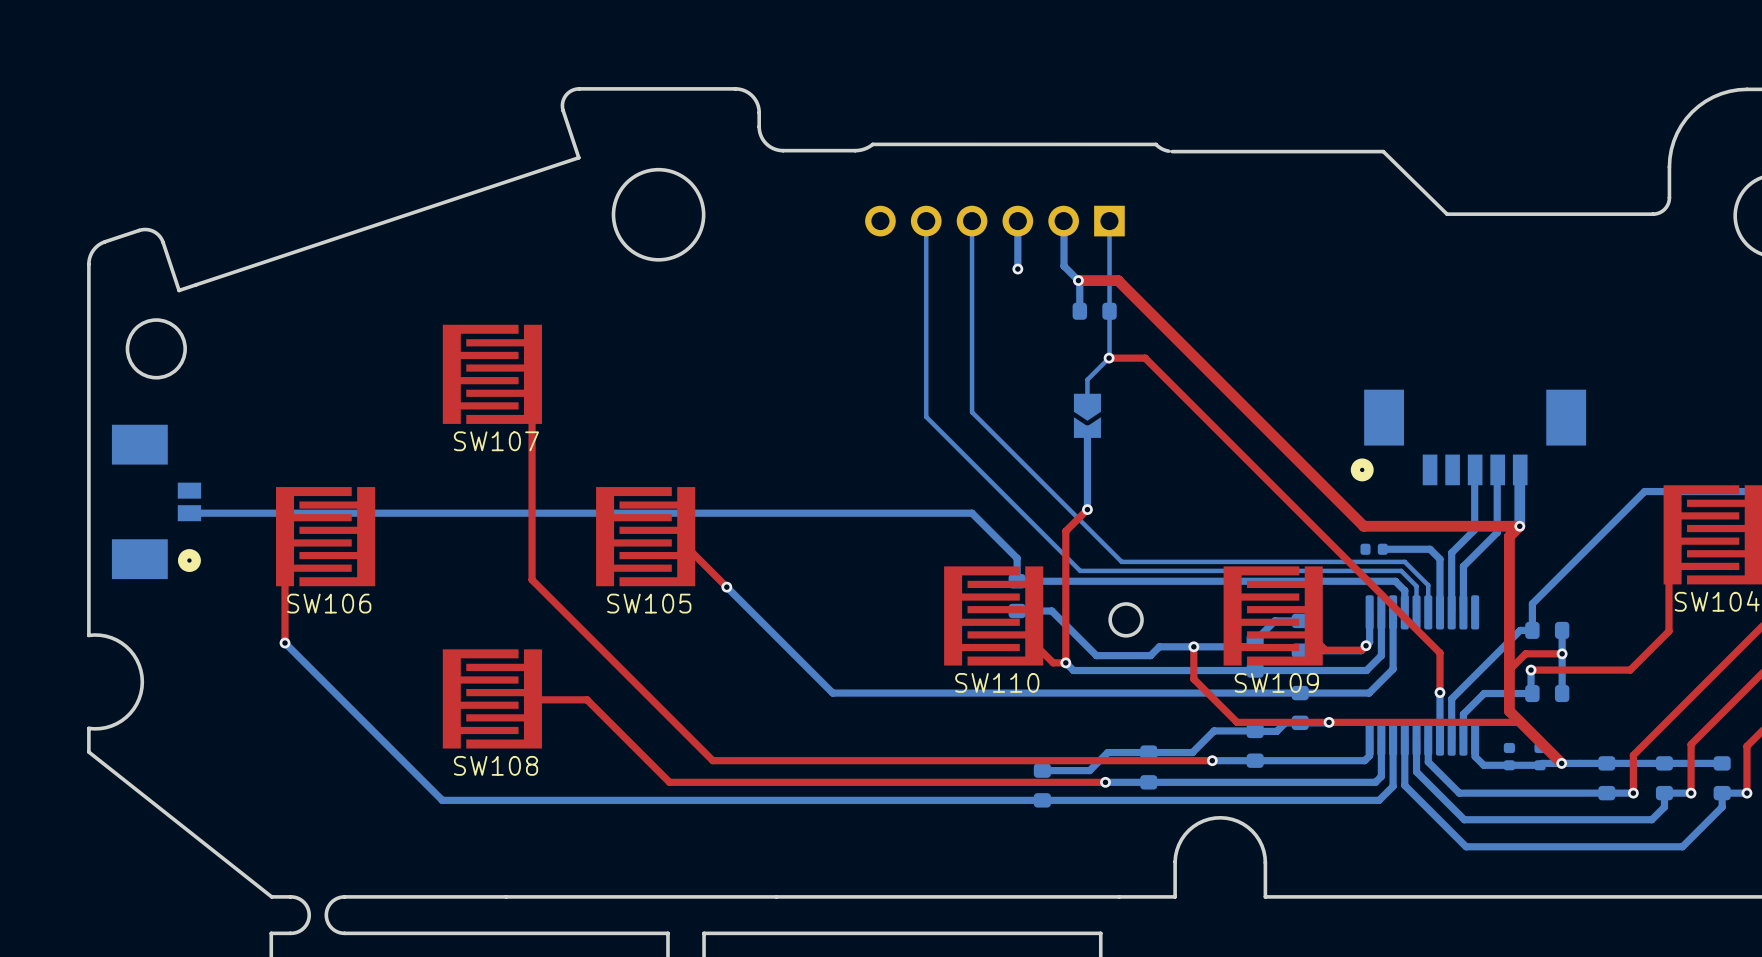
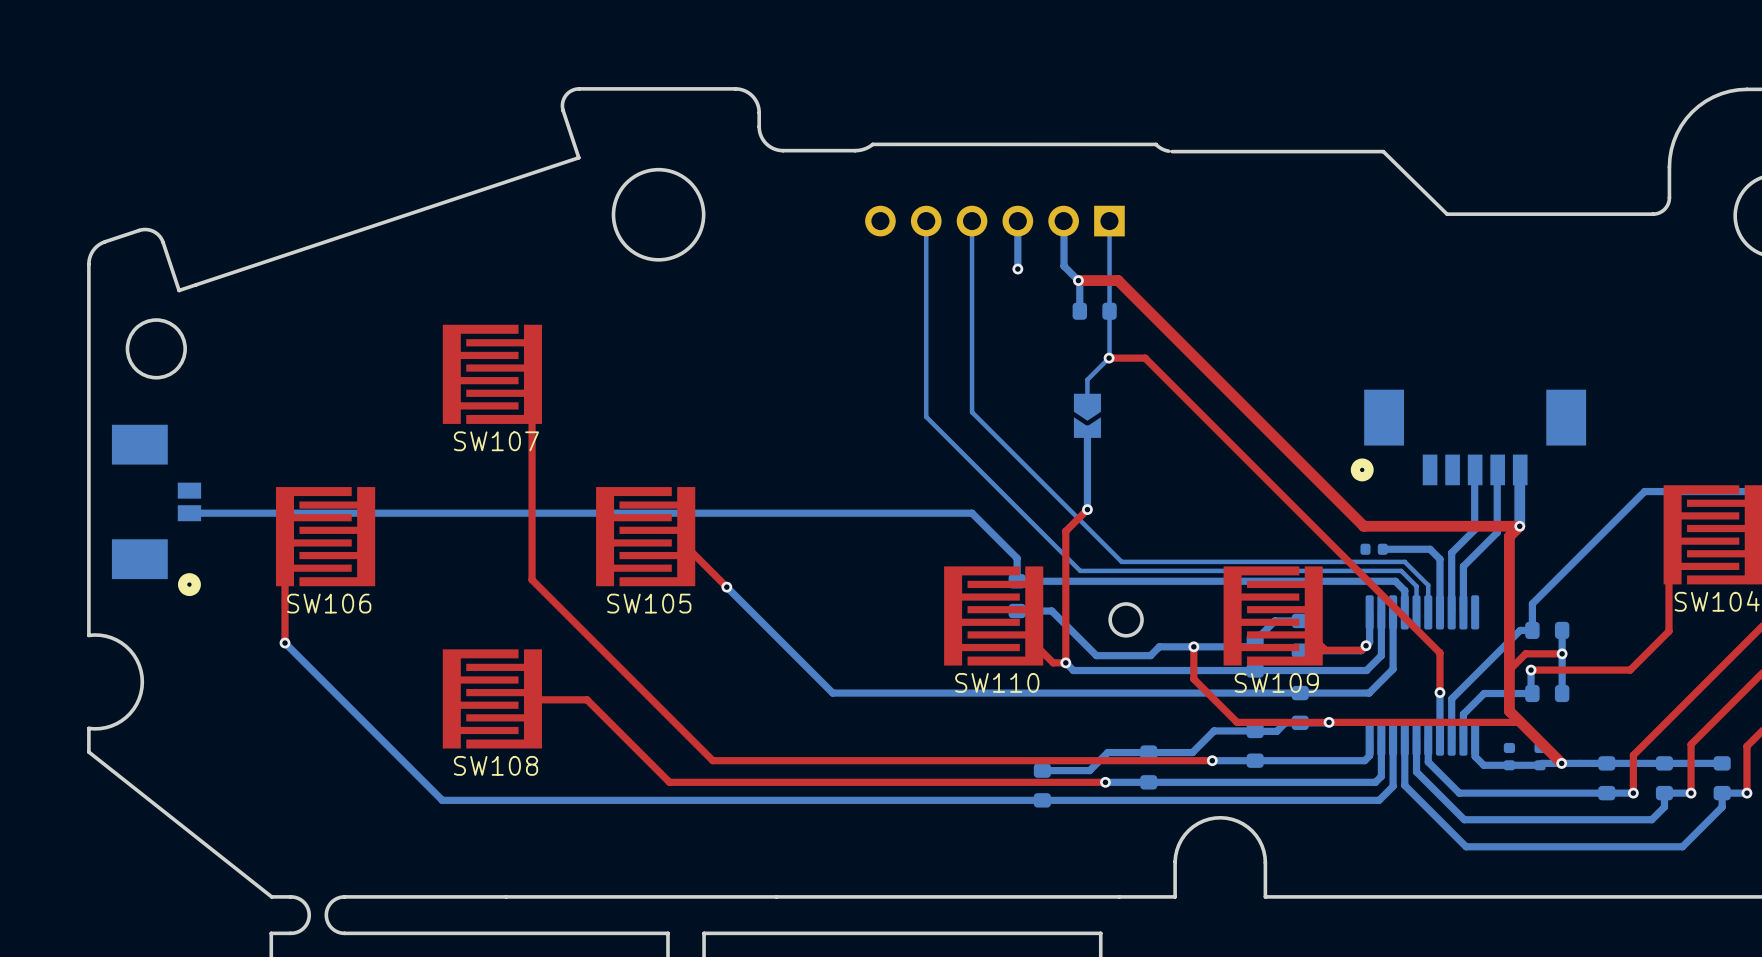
part footprint: [111, 424, 202, 580] -> [111, 424, 202, 597]

